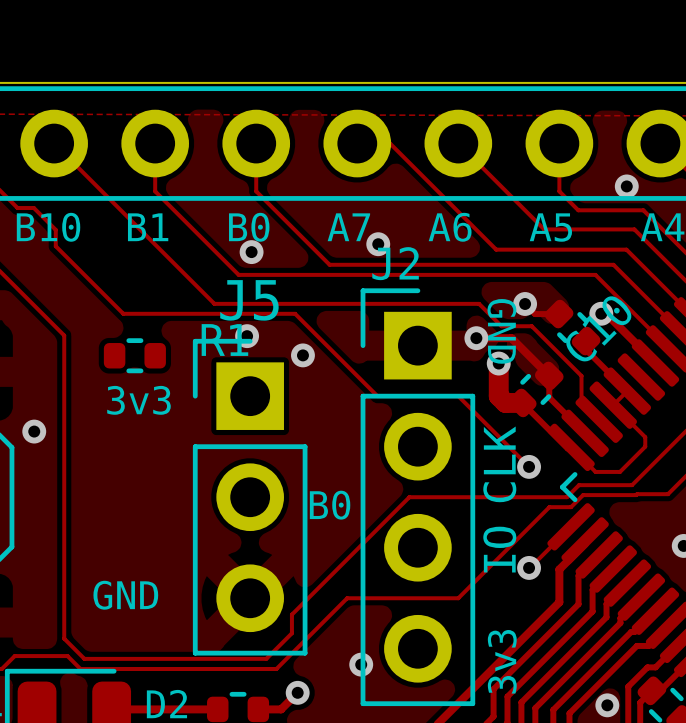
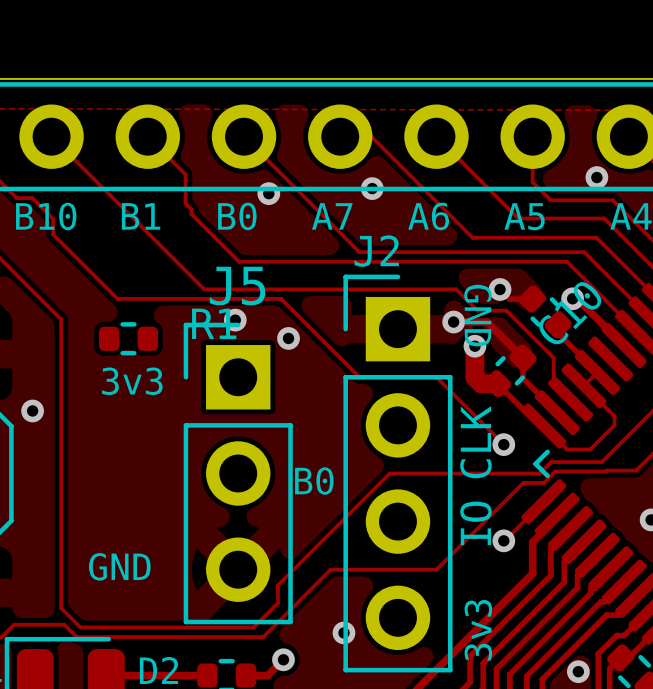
track: (155, 143) (155, 191) (238, 274) (251, 274) -> (147, 136) (185, 174) (185, 203) (191, 209) (191, 214) (239, 261)
track: (256, 143) (256, 191) (329, 264) (377, 264) -> (244, 136) (359, 252)
via: none -> (268, 193)
via position: (378, 244) -> (372, 188)
via: (251, 252) -> none

